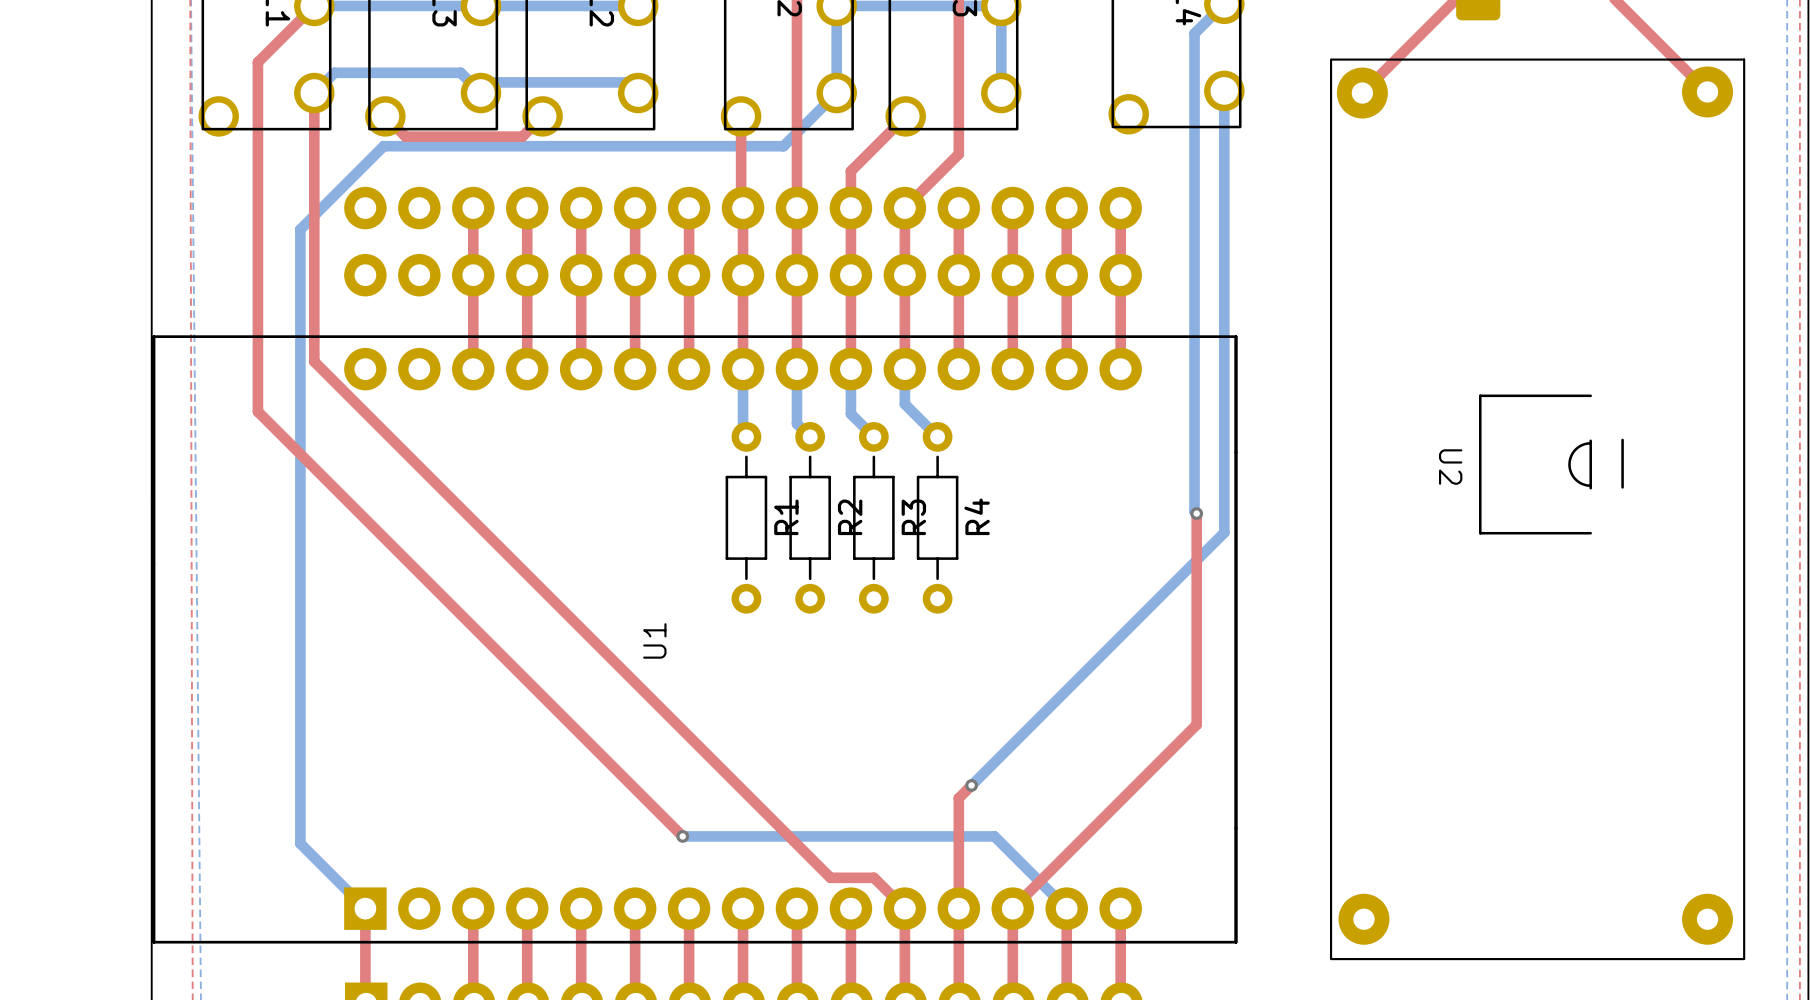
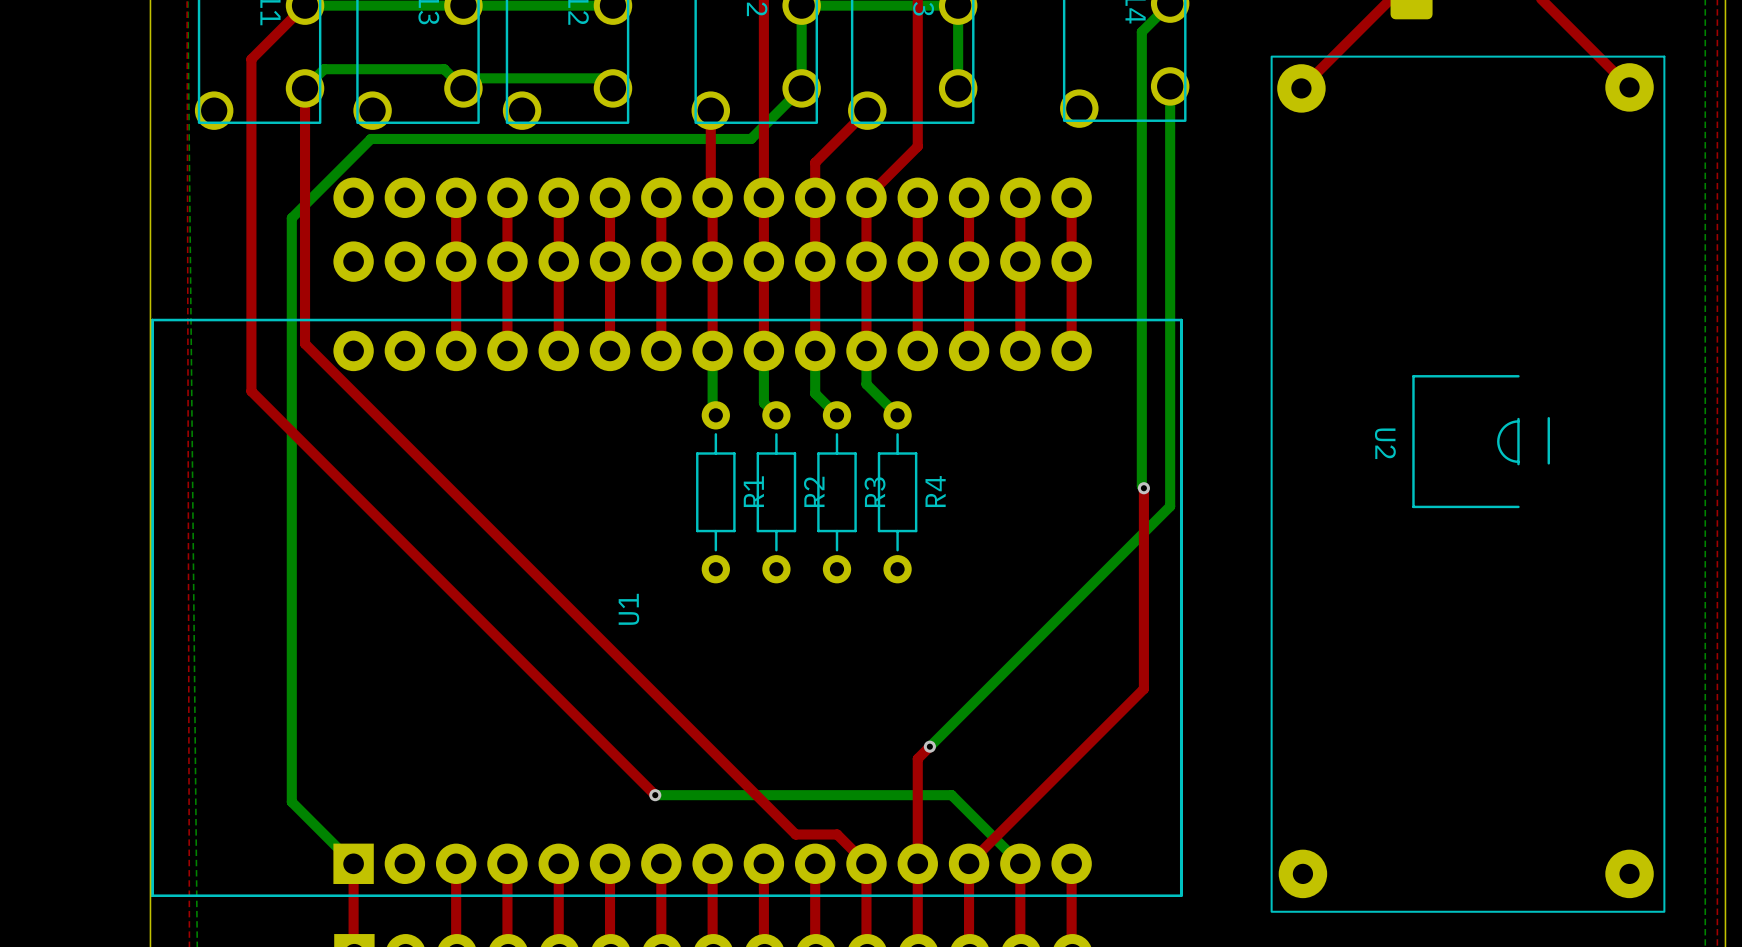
top track: (385, 116) (405, 136) (522, 136) (542, 116) -> none

